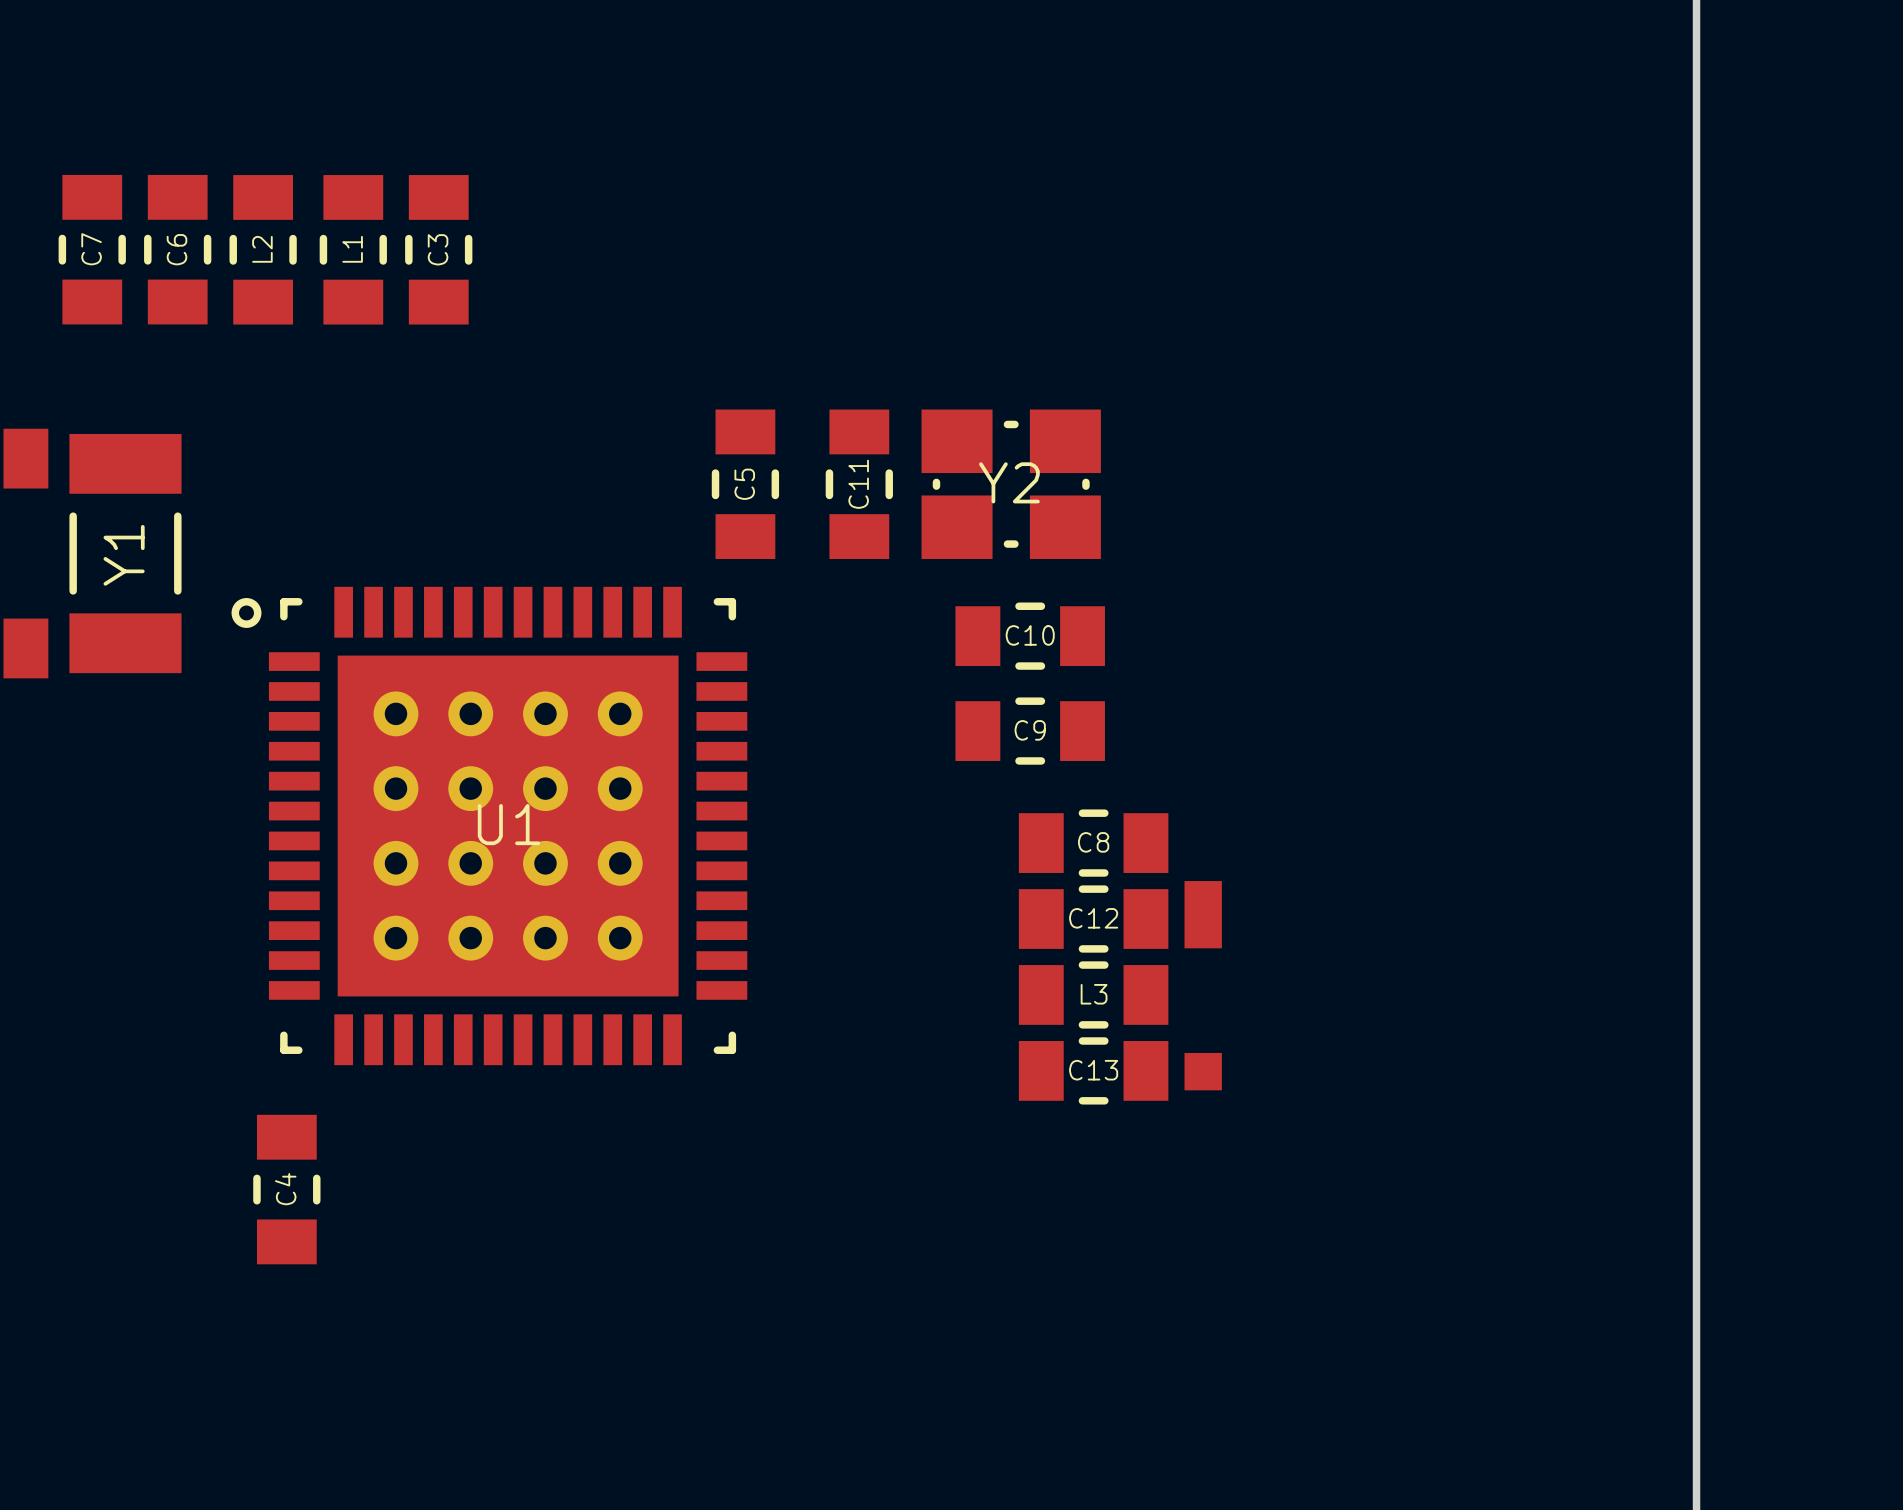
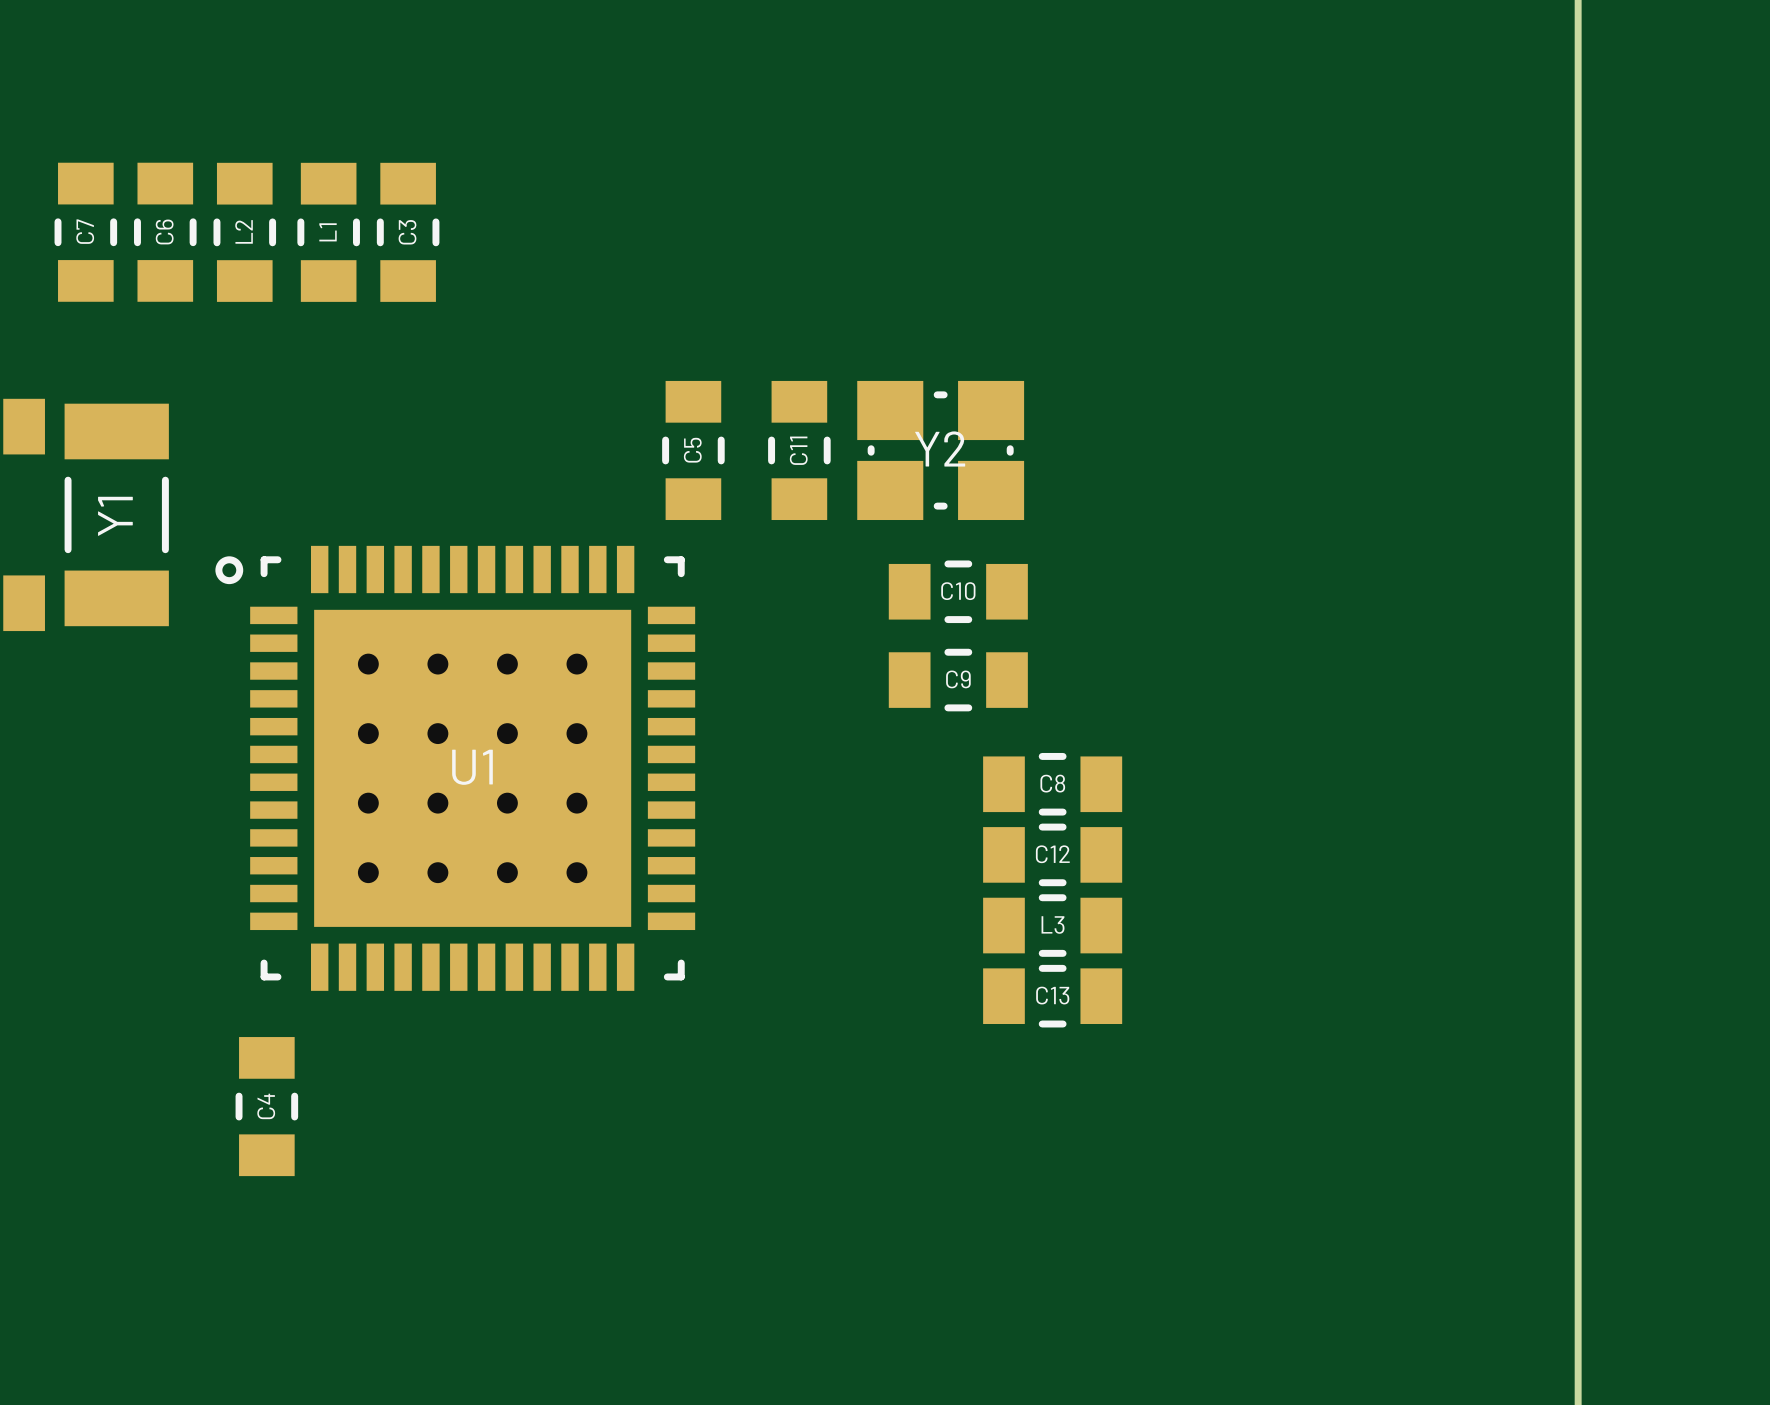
C8 position: (1093, 843) -> (1052, 784)
C12 position: (1093, 919) -> (1052, 854)
part: (1203, 985) -> none
L3 position: (1093, 994) -> (1052, 925)
C13 position: (1093, 1070) -> (1052, 996)

